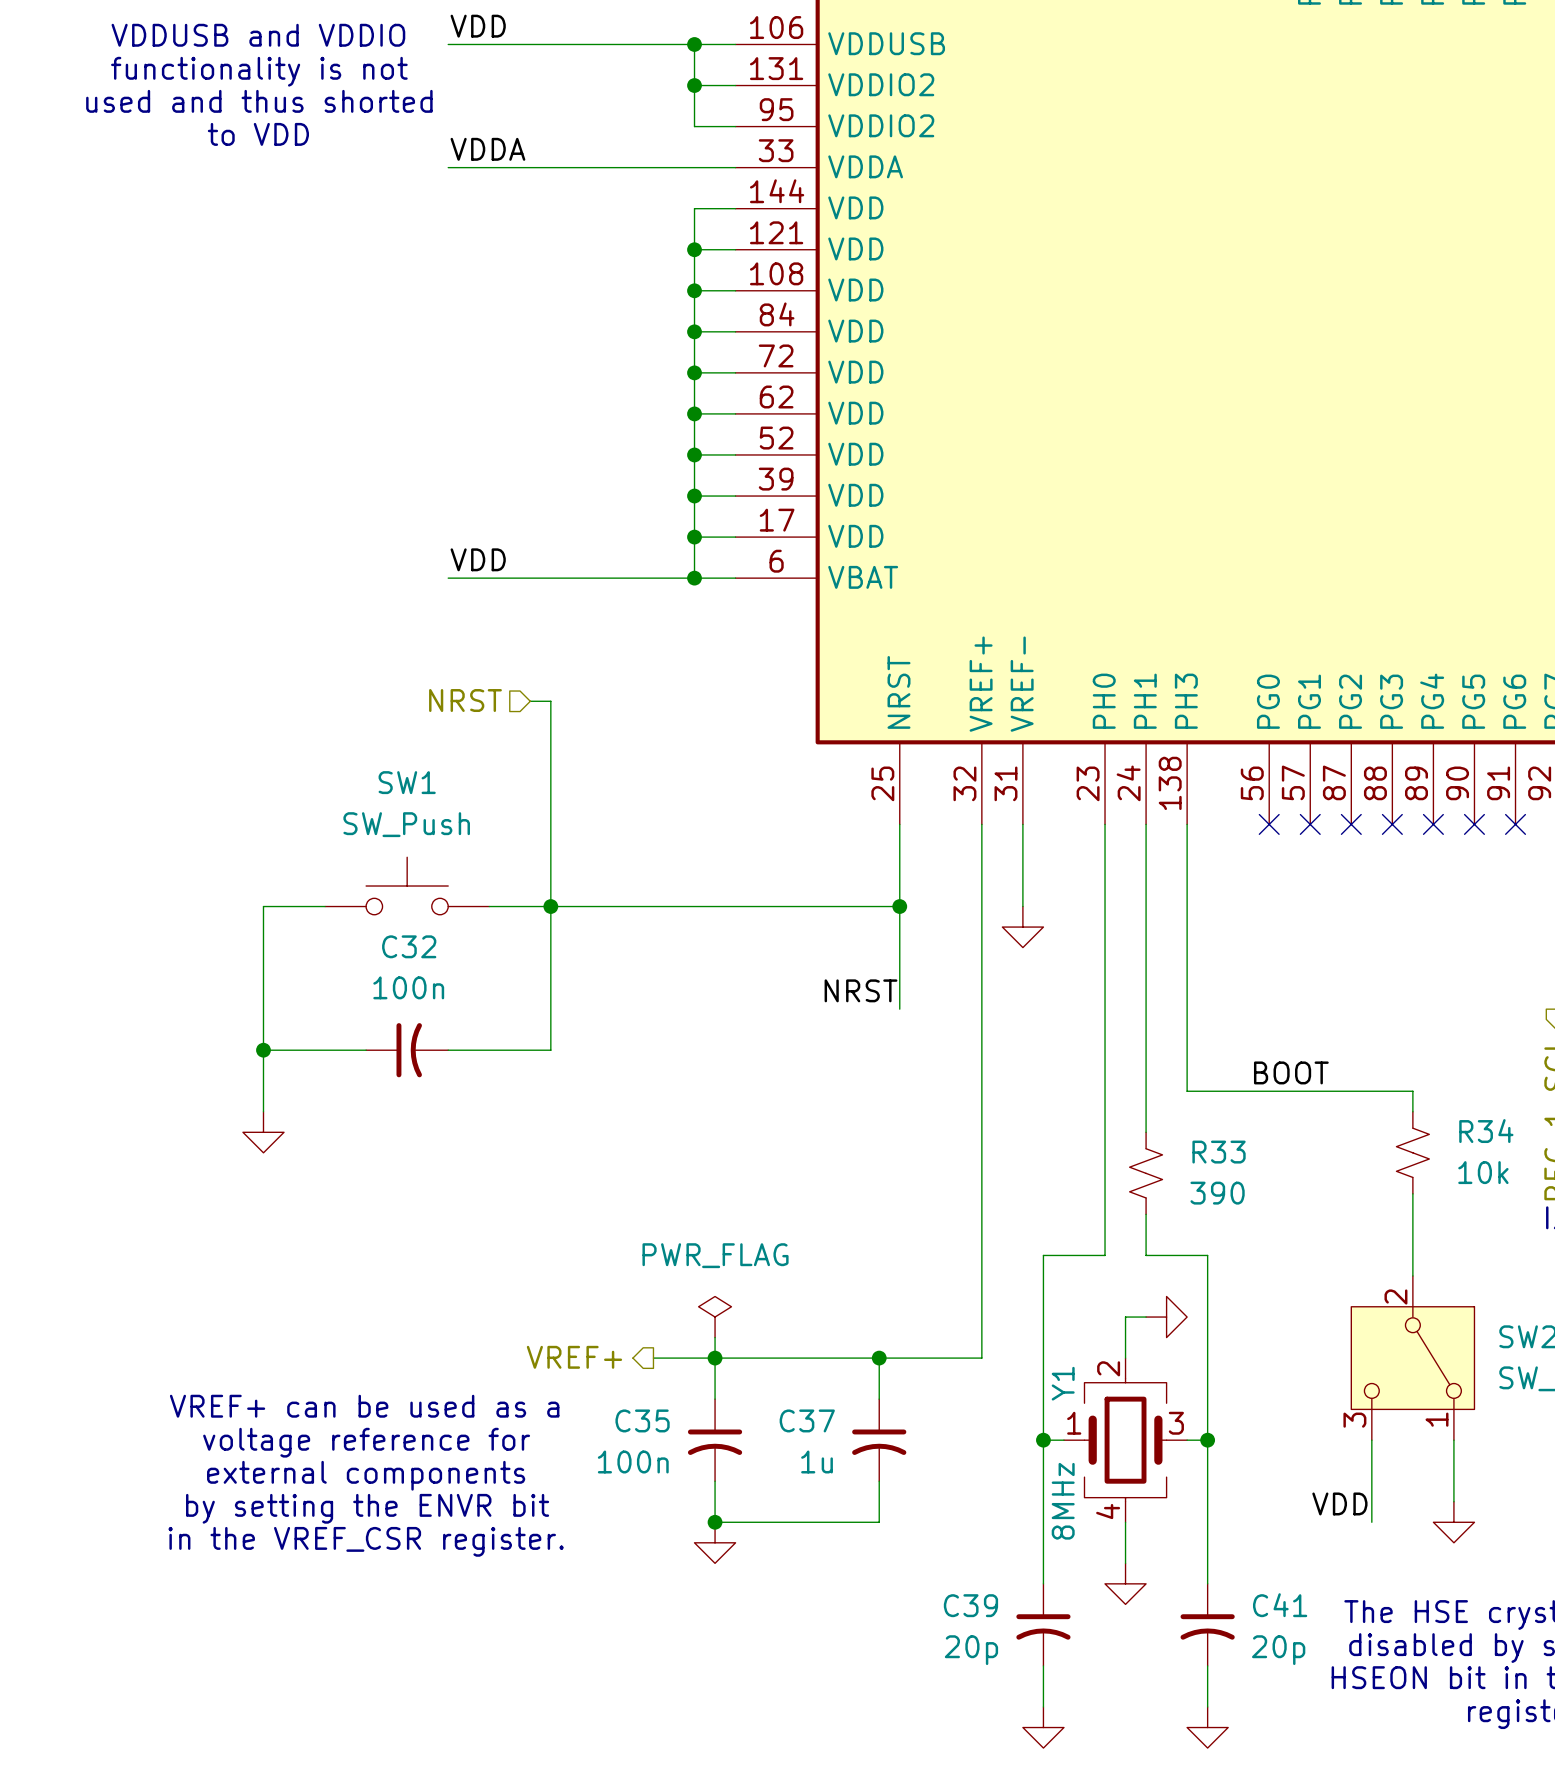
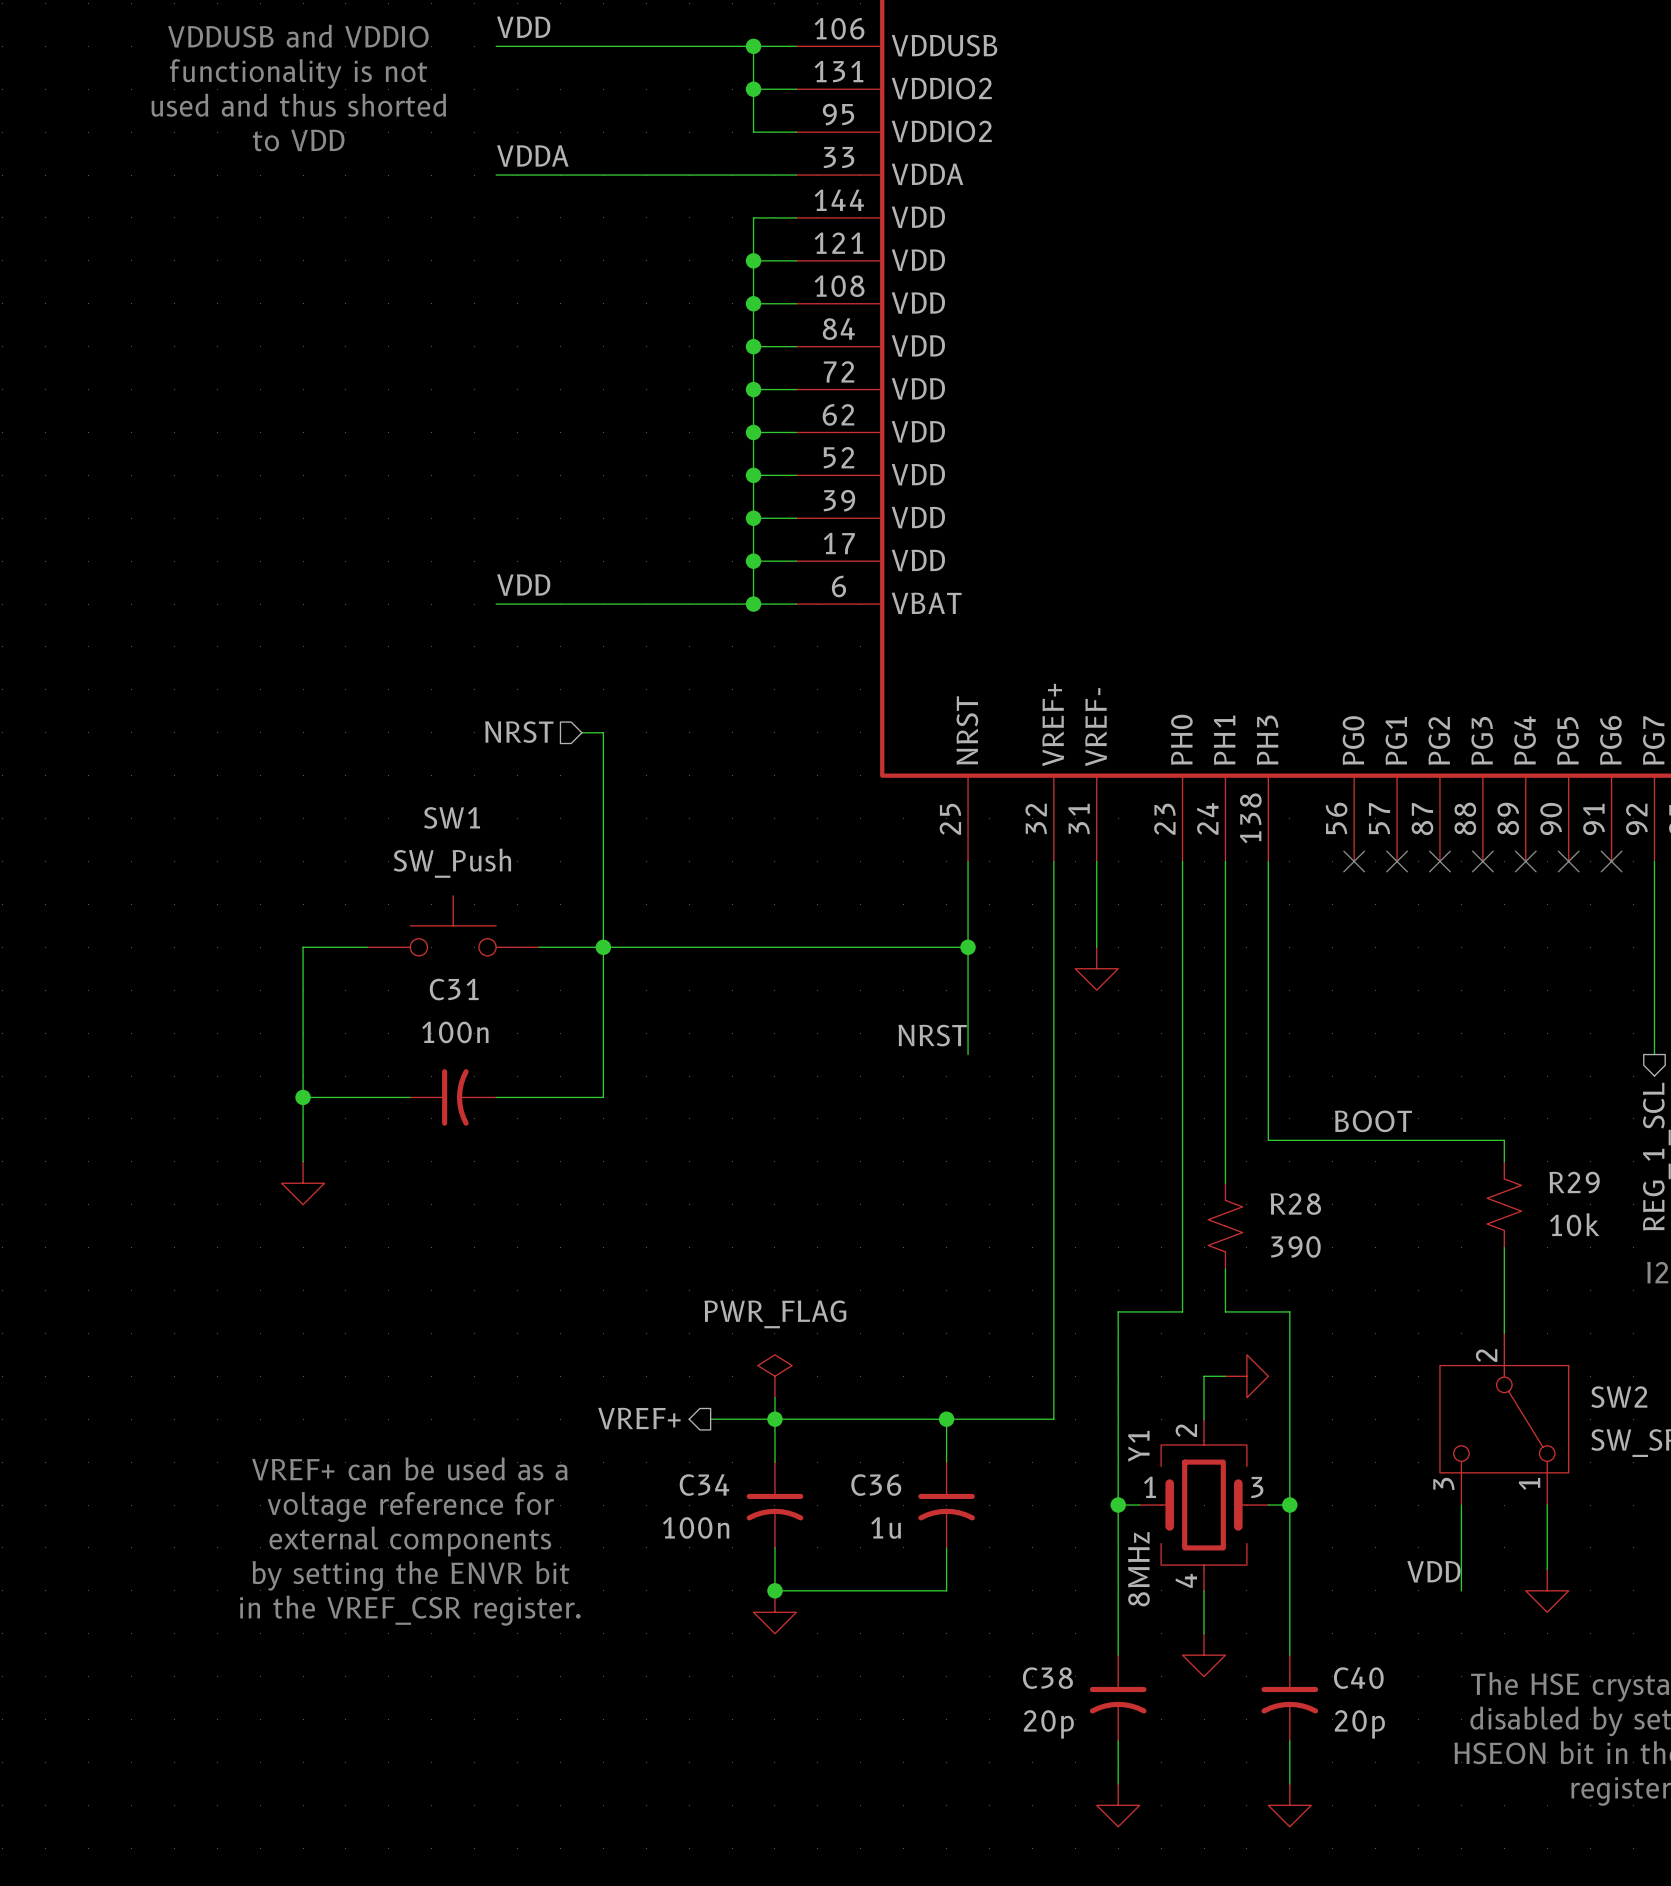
C32 name: C32 (409, 946) -> C31 (454, 989)
R34 name: R34 (1486, 1131) -> R29 (1574, 1182)
R33 name: R33 (1219, 1152) -> R28 (1295, 1204)
C35 name: C35 (642, 1420) -> C34 (704, 1485)
C37 name: C37 (807, 1420) -> C36 (876, 1485)
C39 name: C39 (970, 1605) -> C38 (1047, 1678)
C41 name: C41 (1280, 1605) -> C40 (1358, 1678)

